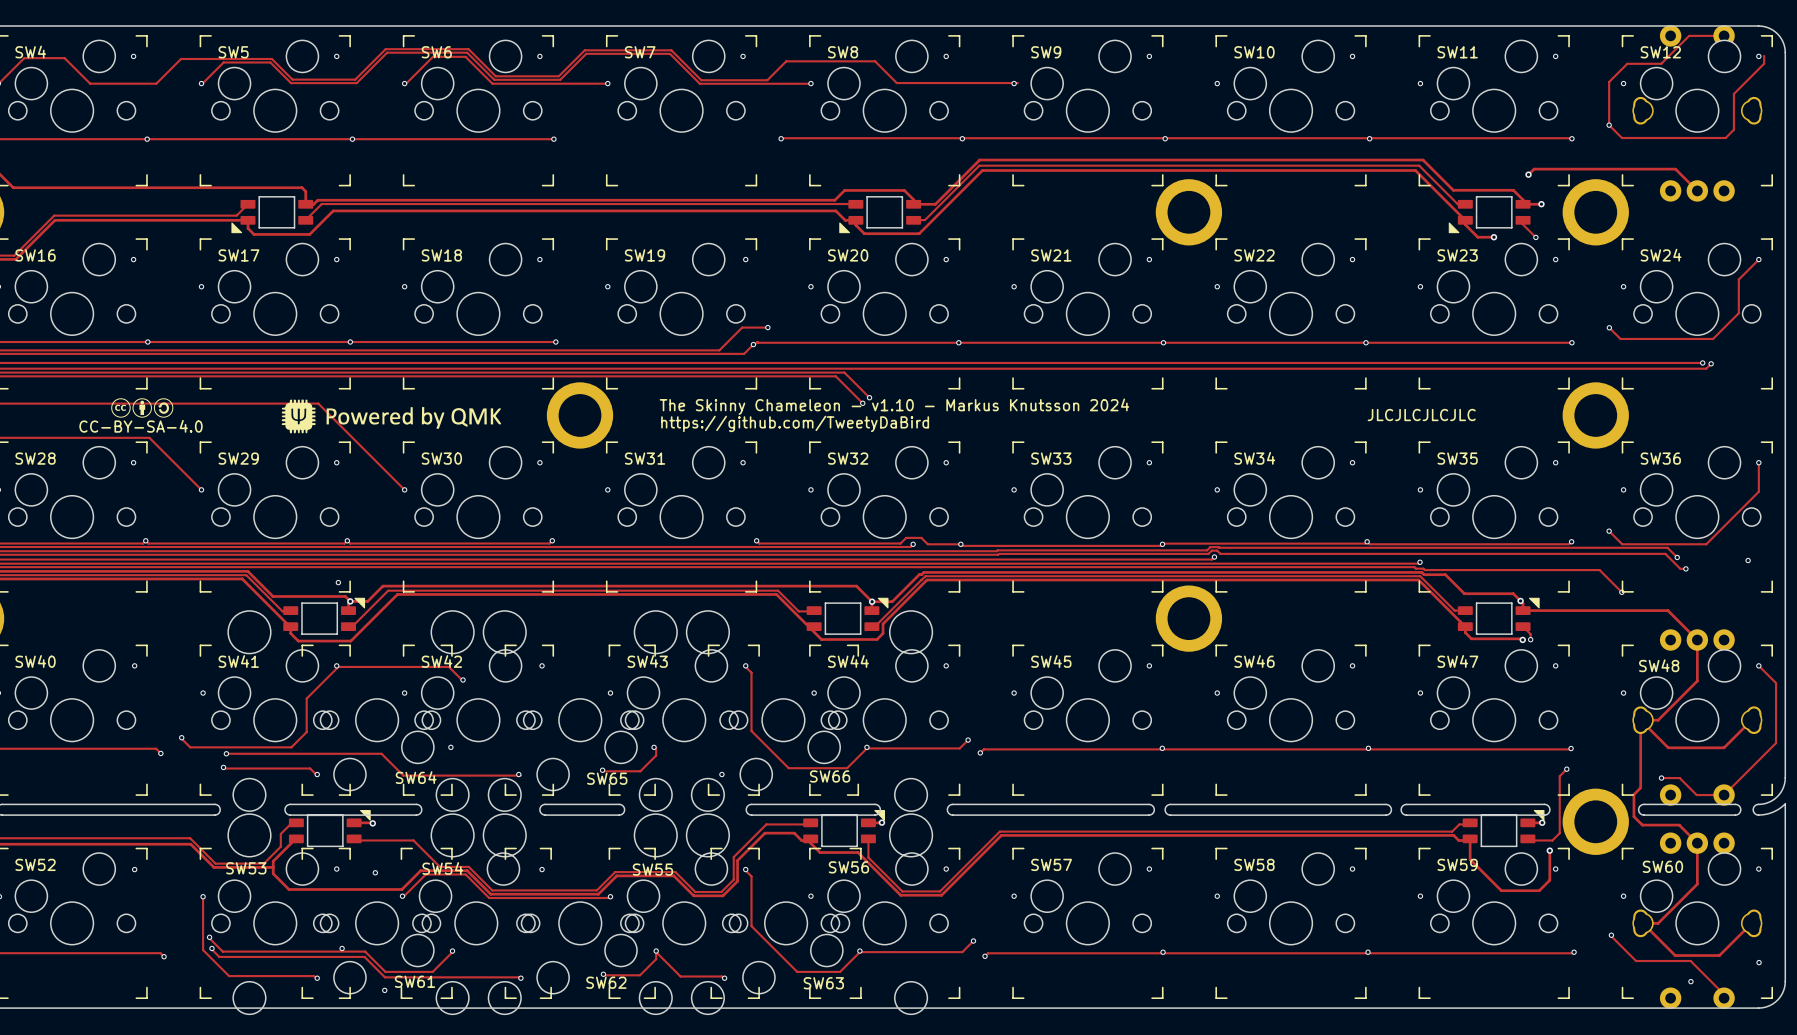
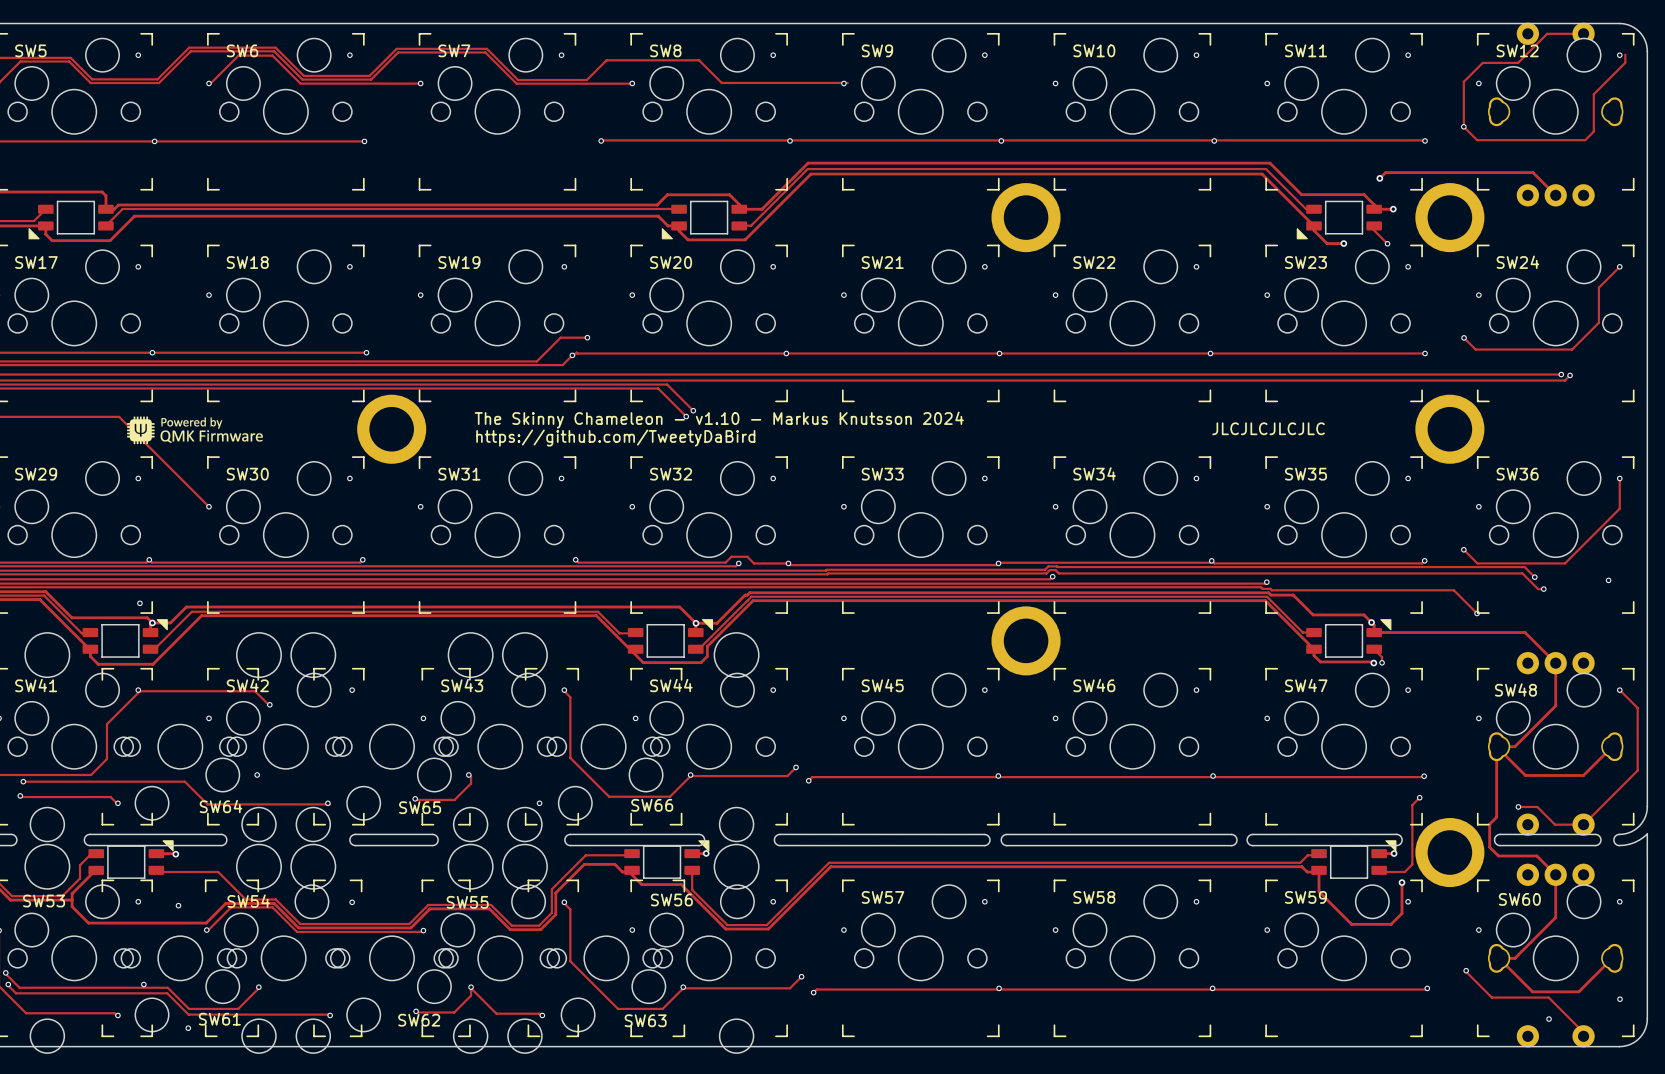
drawing shape: [281, 399, 502, 434] -> [127, 416, 263, 445]

